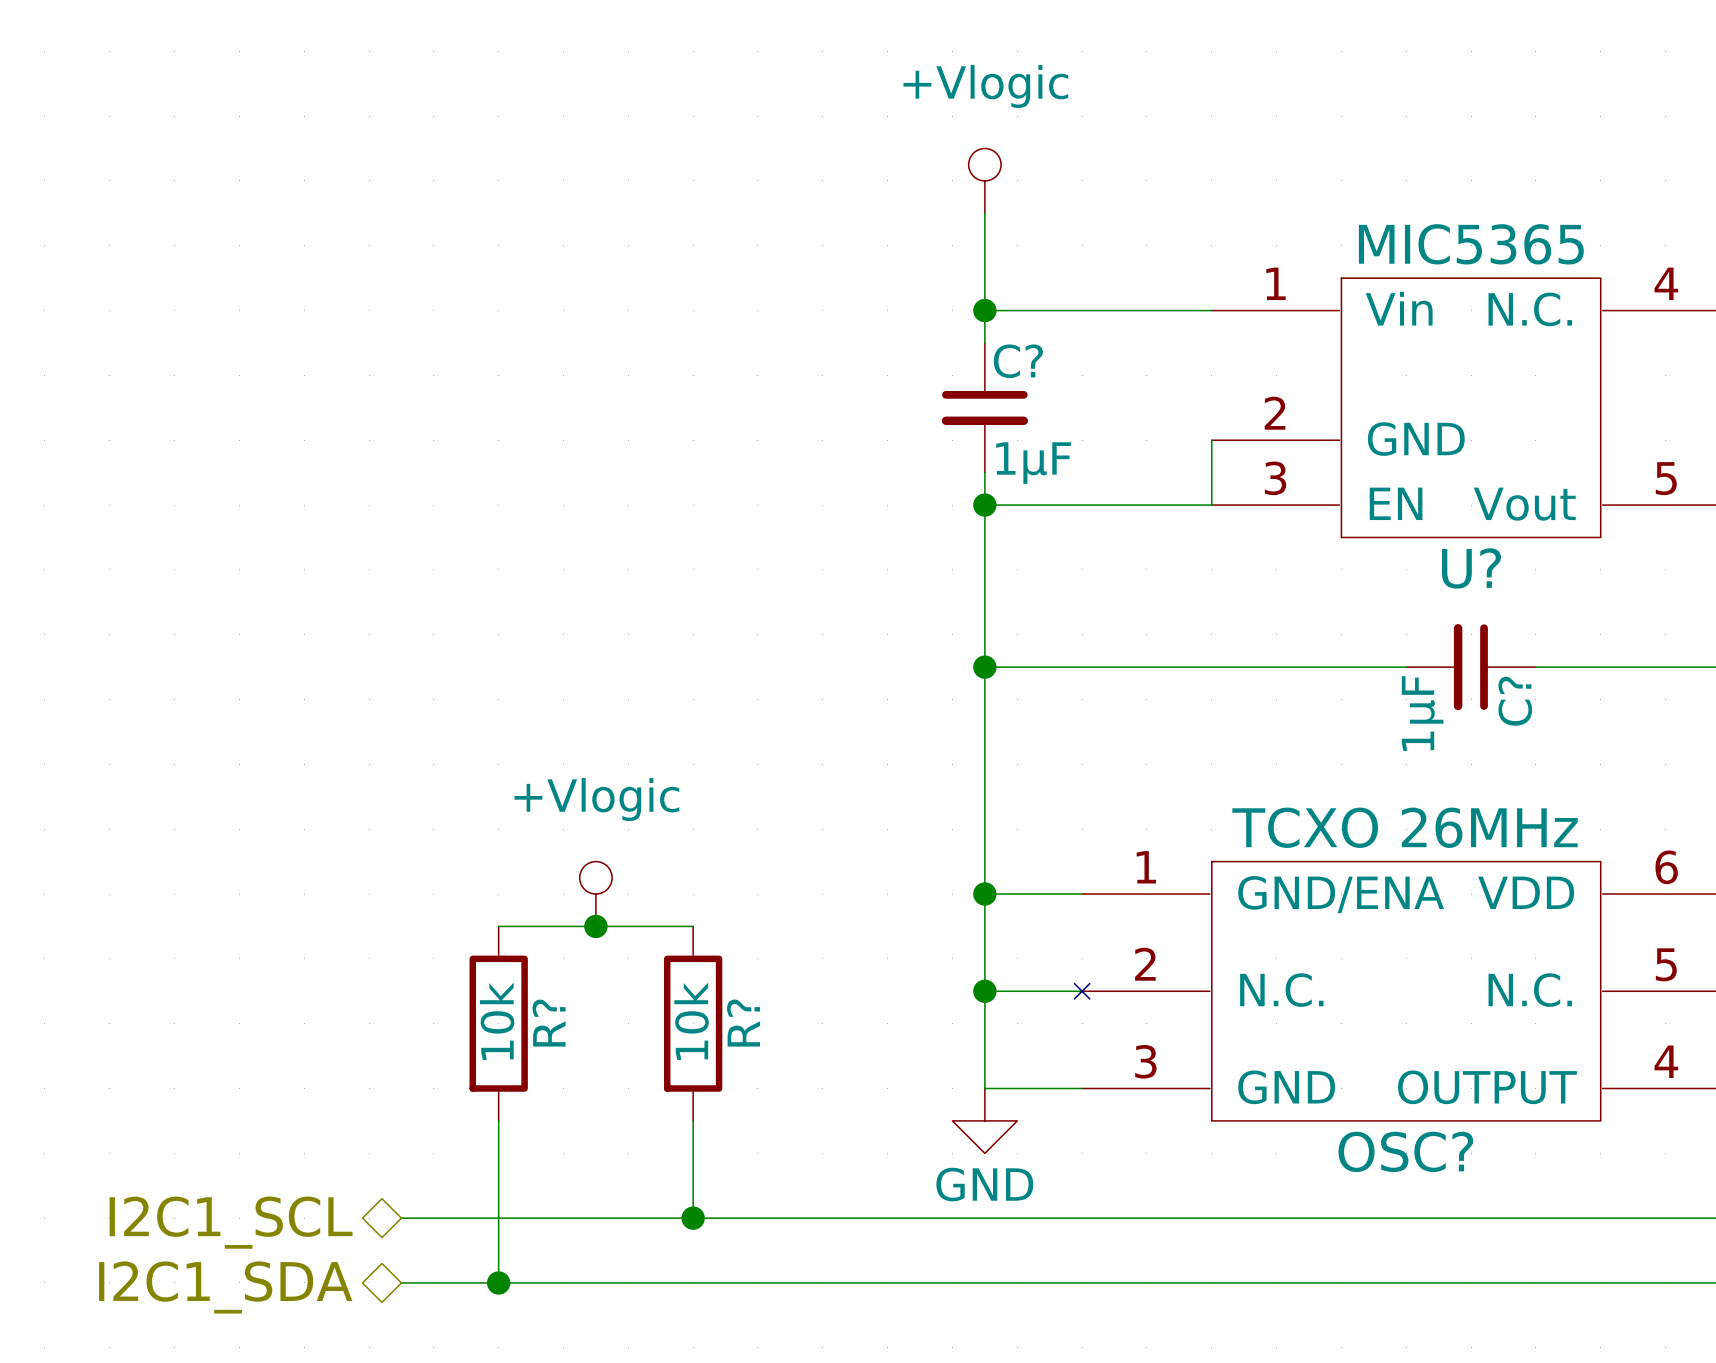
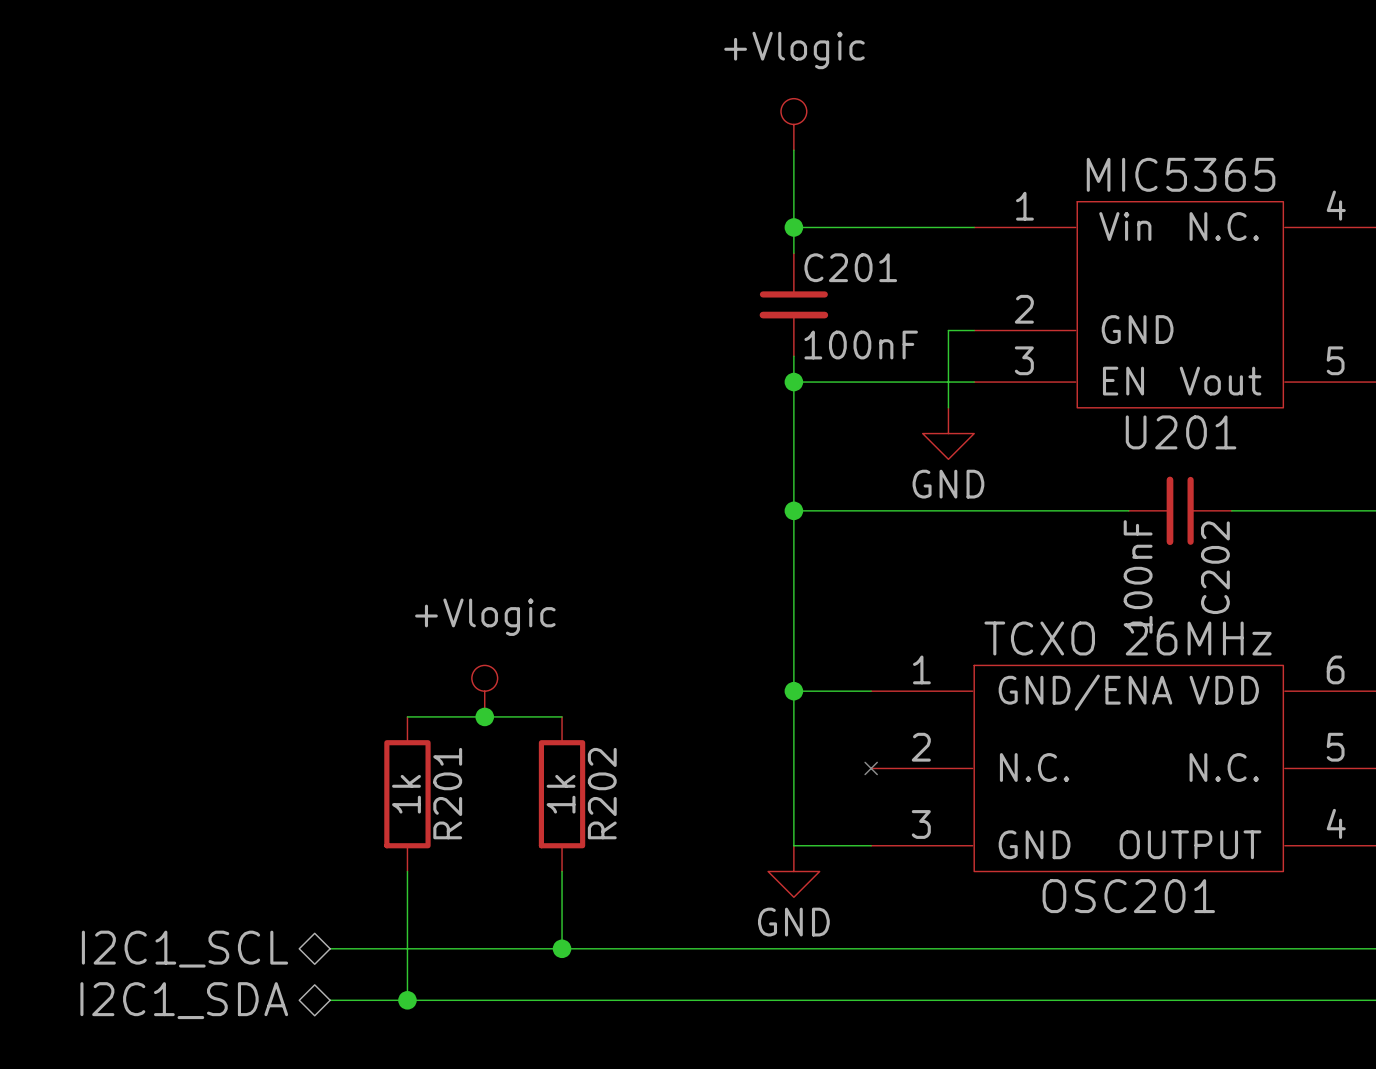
C? name: C? (1018, 361) -> C201 (850, 267)
wire: (1211, 440) (1211, 505) -> (974, 330) (948, 330) (948, 407)
C? value: 1µF (1033, 463) -> 100nF (861, 345)
U? name: U? (1471, 568) -> U201 (1181, 432)
power symbol: none -> GND (948, 433)
C? name: C? (1515, 701) -> C202 (1215, 567)
C? value: 1µF (1422, 713) -> 100nF (1138, 576)
wire: (984, 991) (1082, 991) -> none
junction: (984, 991) -> none
R? value: 10k (497, 1021) -> 1k (406, 794)
R? value: 10k (691, 1021) -> 1k (561, 794)
R? name: R? (549, 1023) -> R201 (447, 793)
R? name: R? (743, 1023) -> R202 (602, 793)
OSC? name: OSC? (1405, 1151) -> OSC201 (1128, 896)

